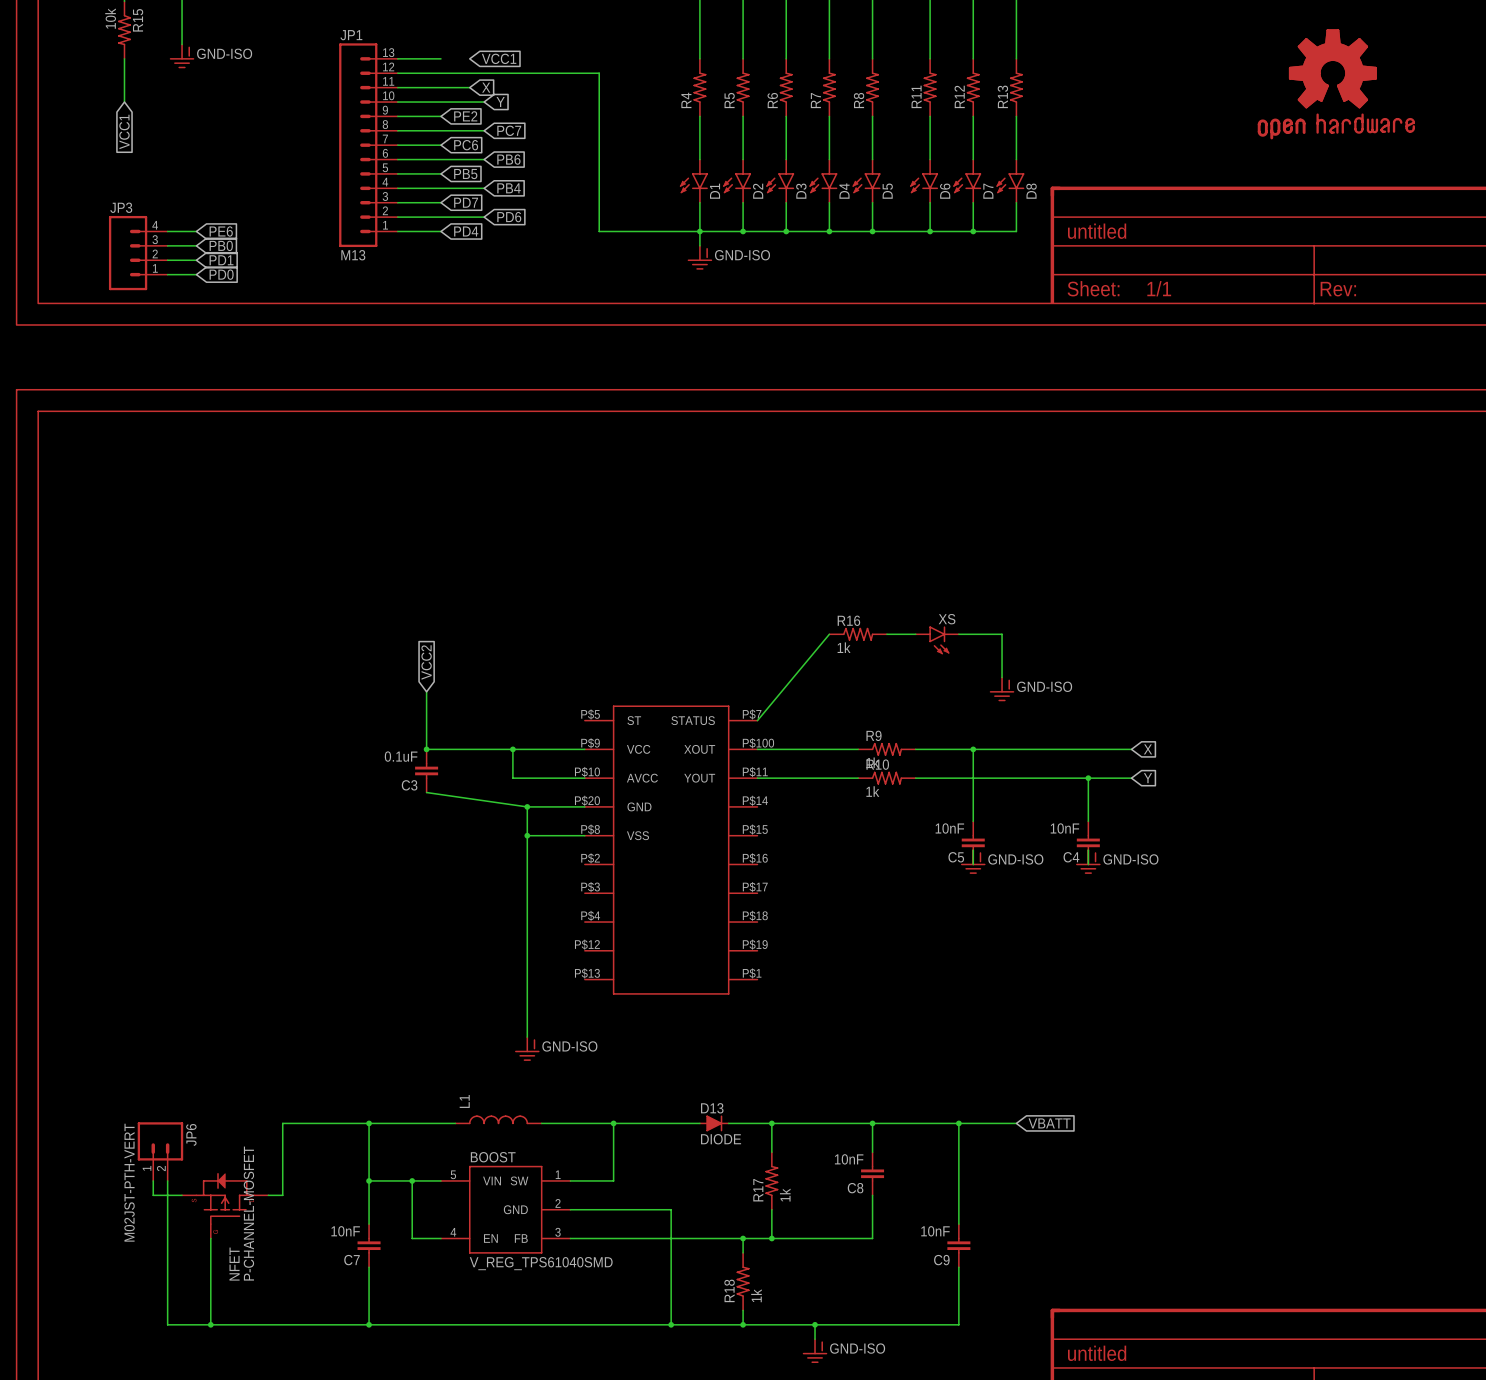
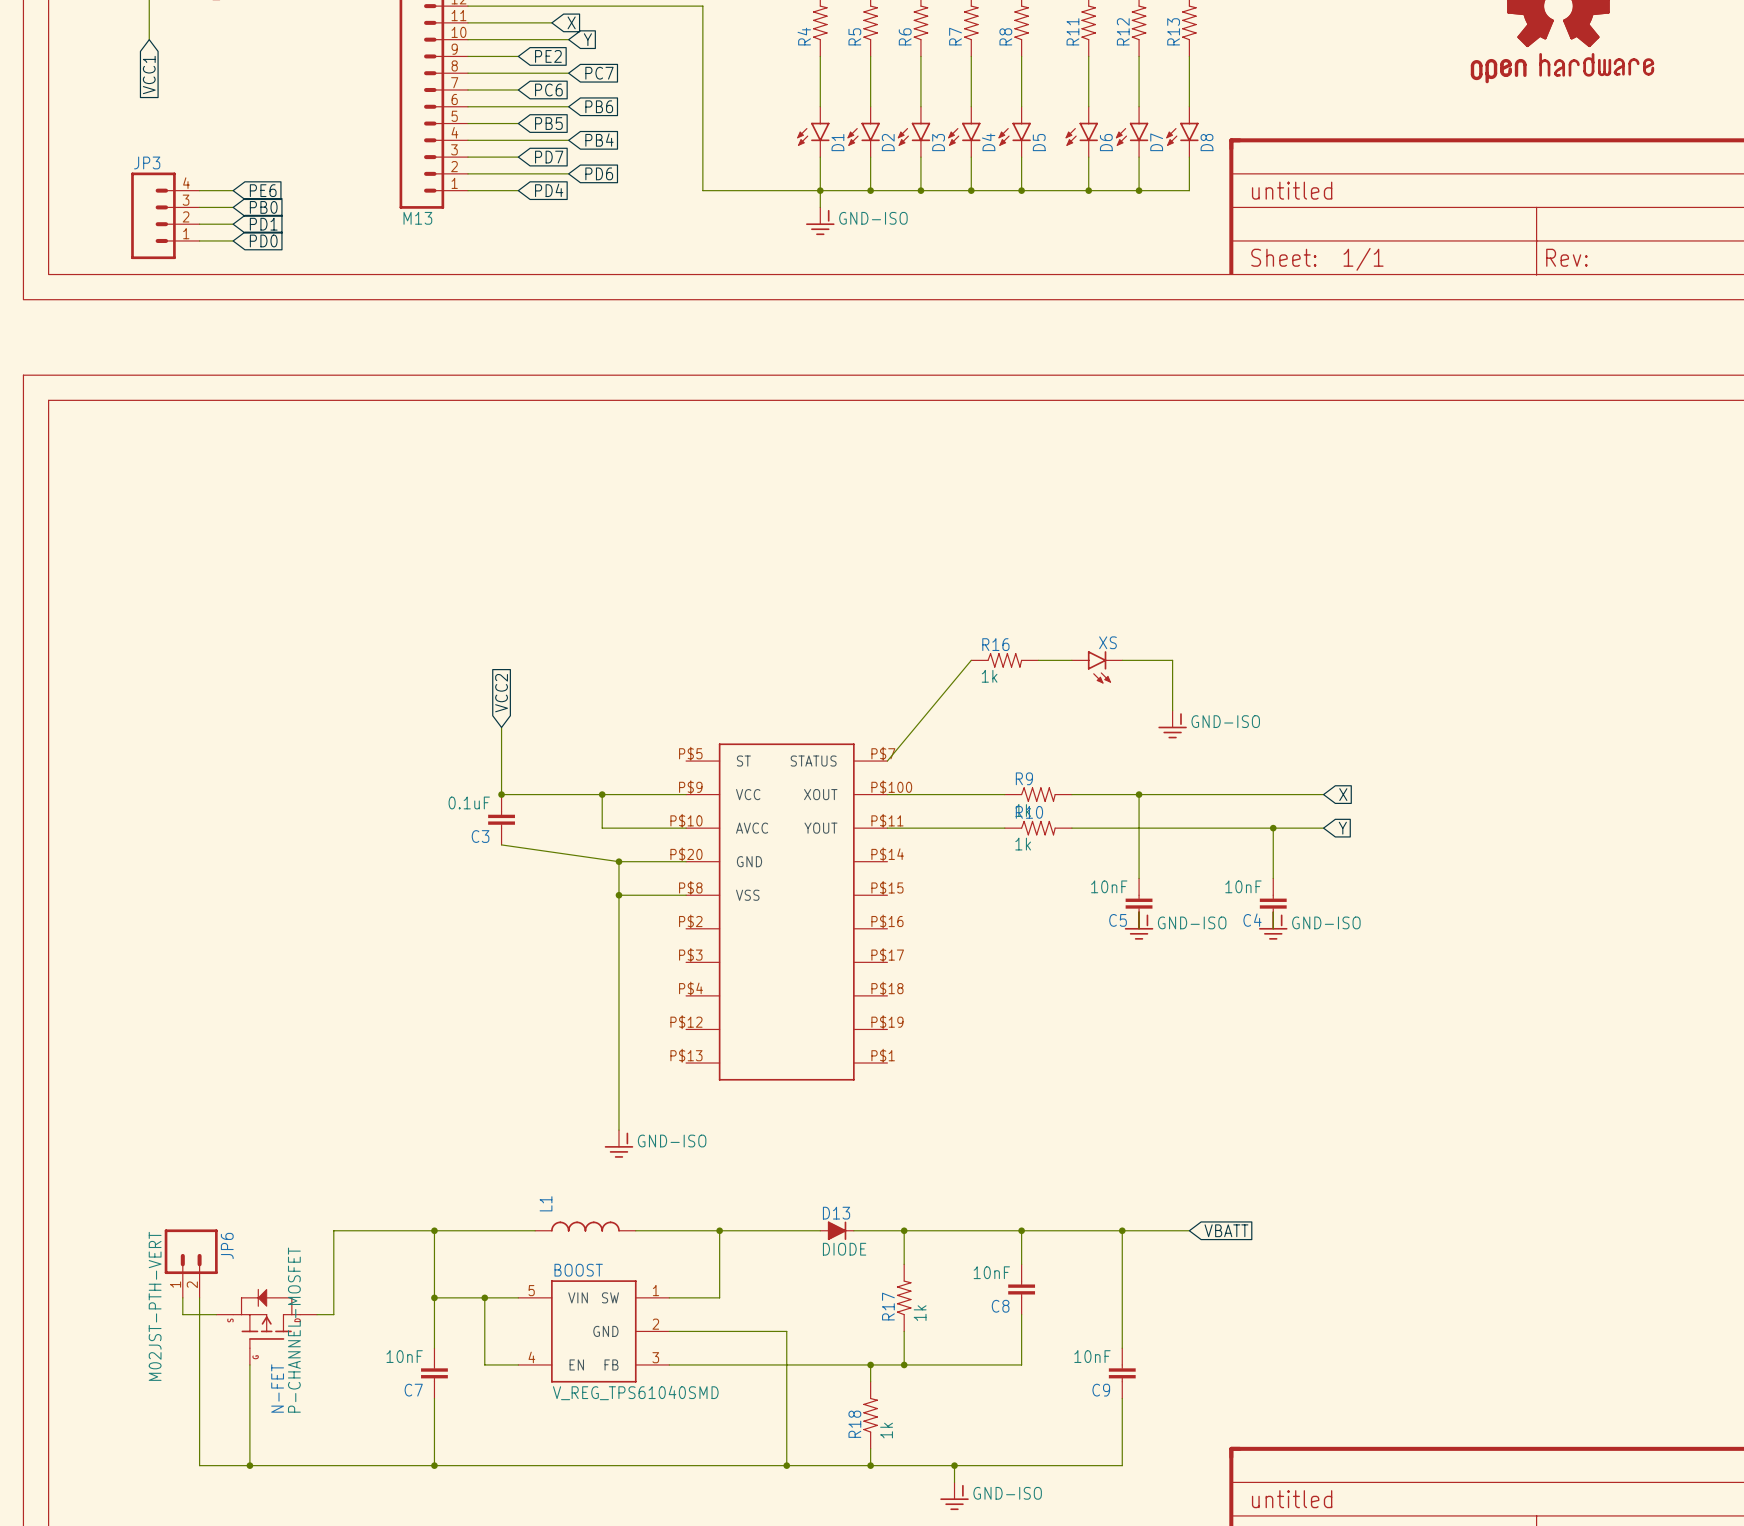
NFET name: NFET (234, 1264) -> N-FET (277, 1388)

